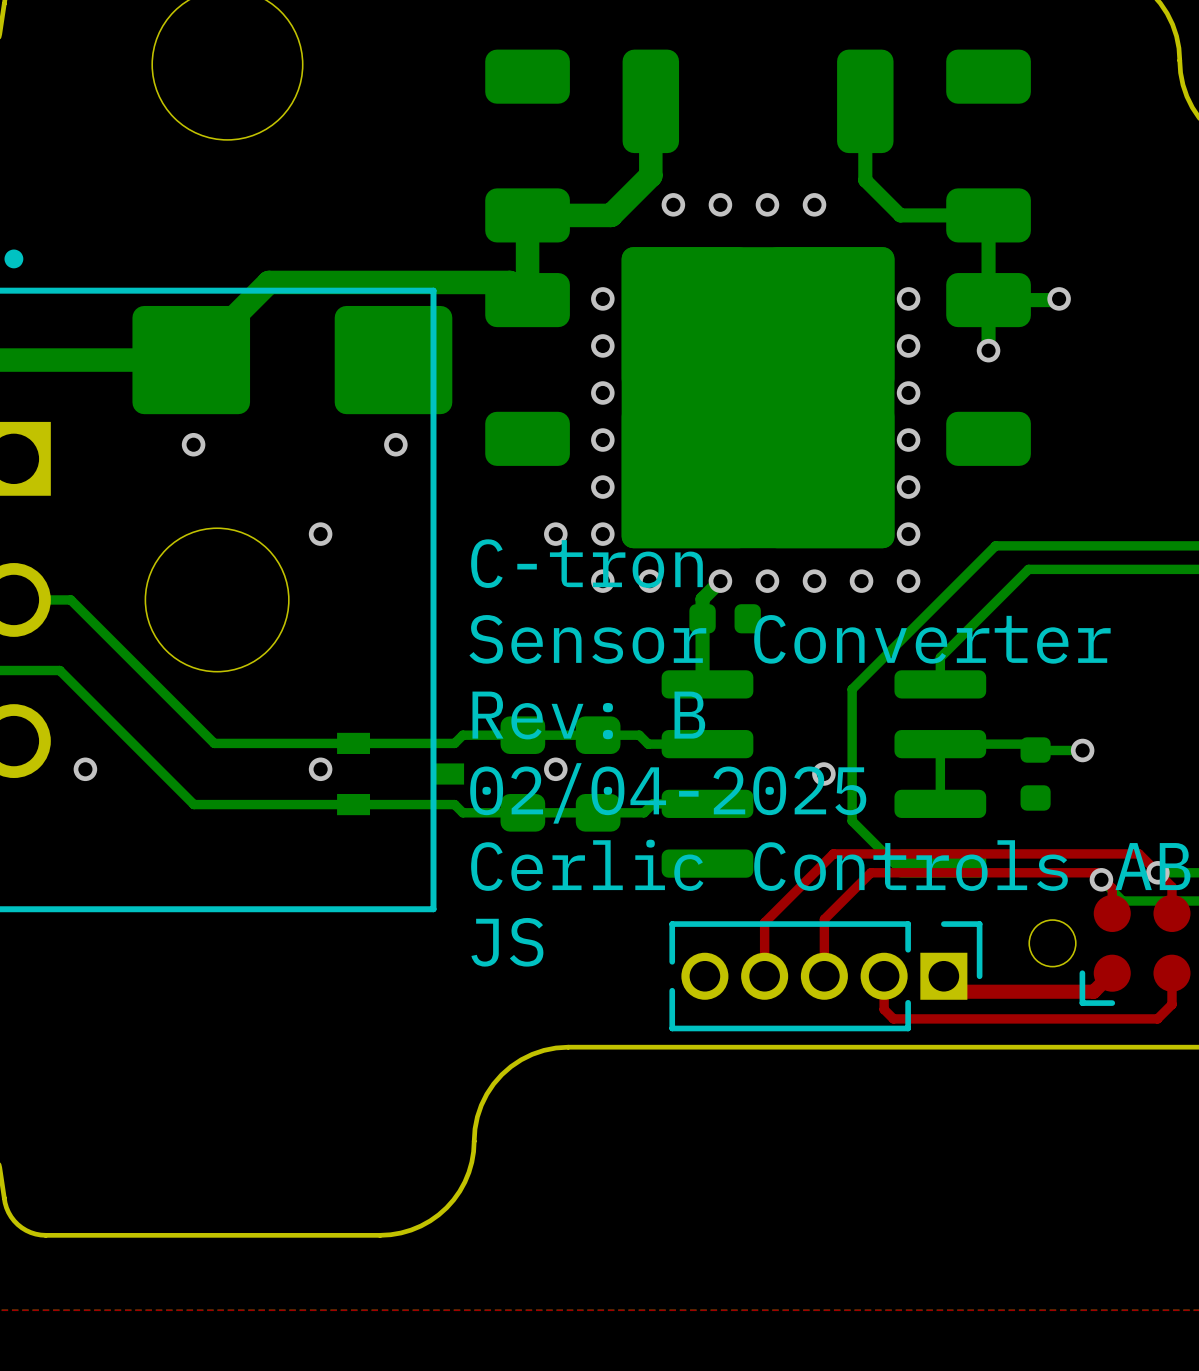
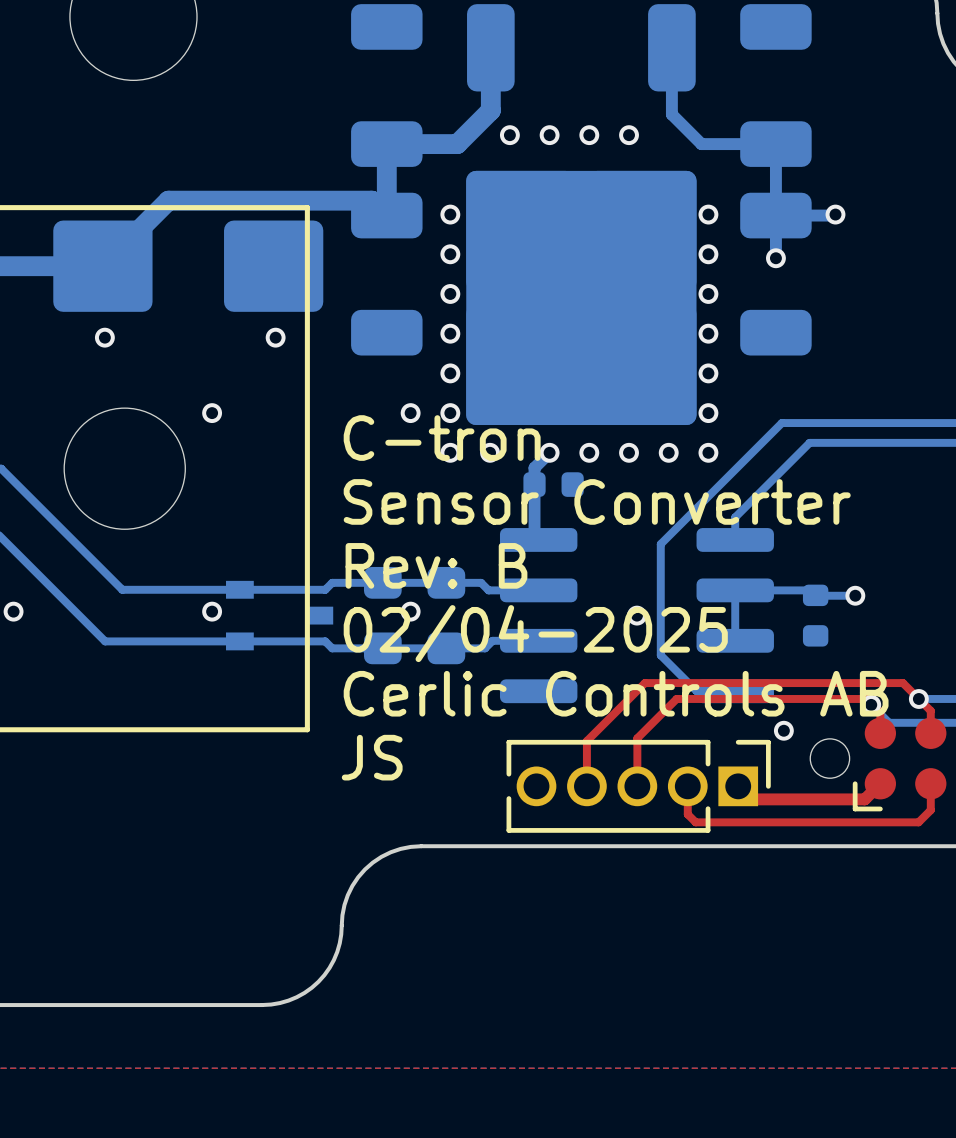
via: none -> (783, 730)

